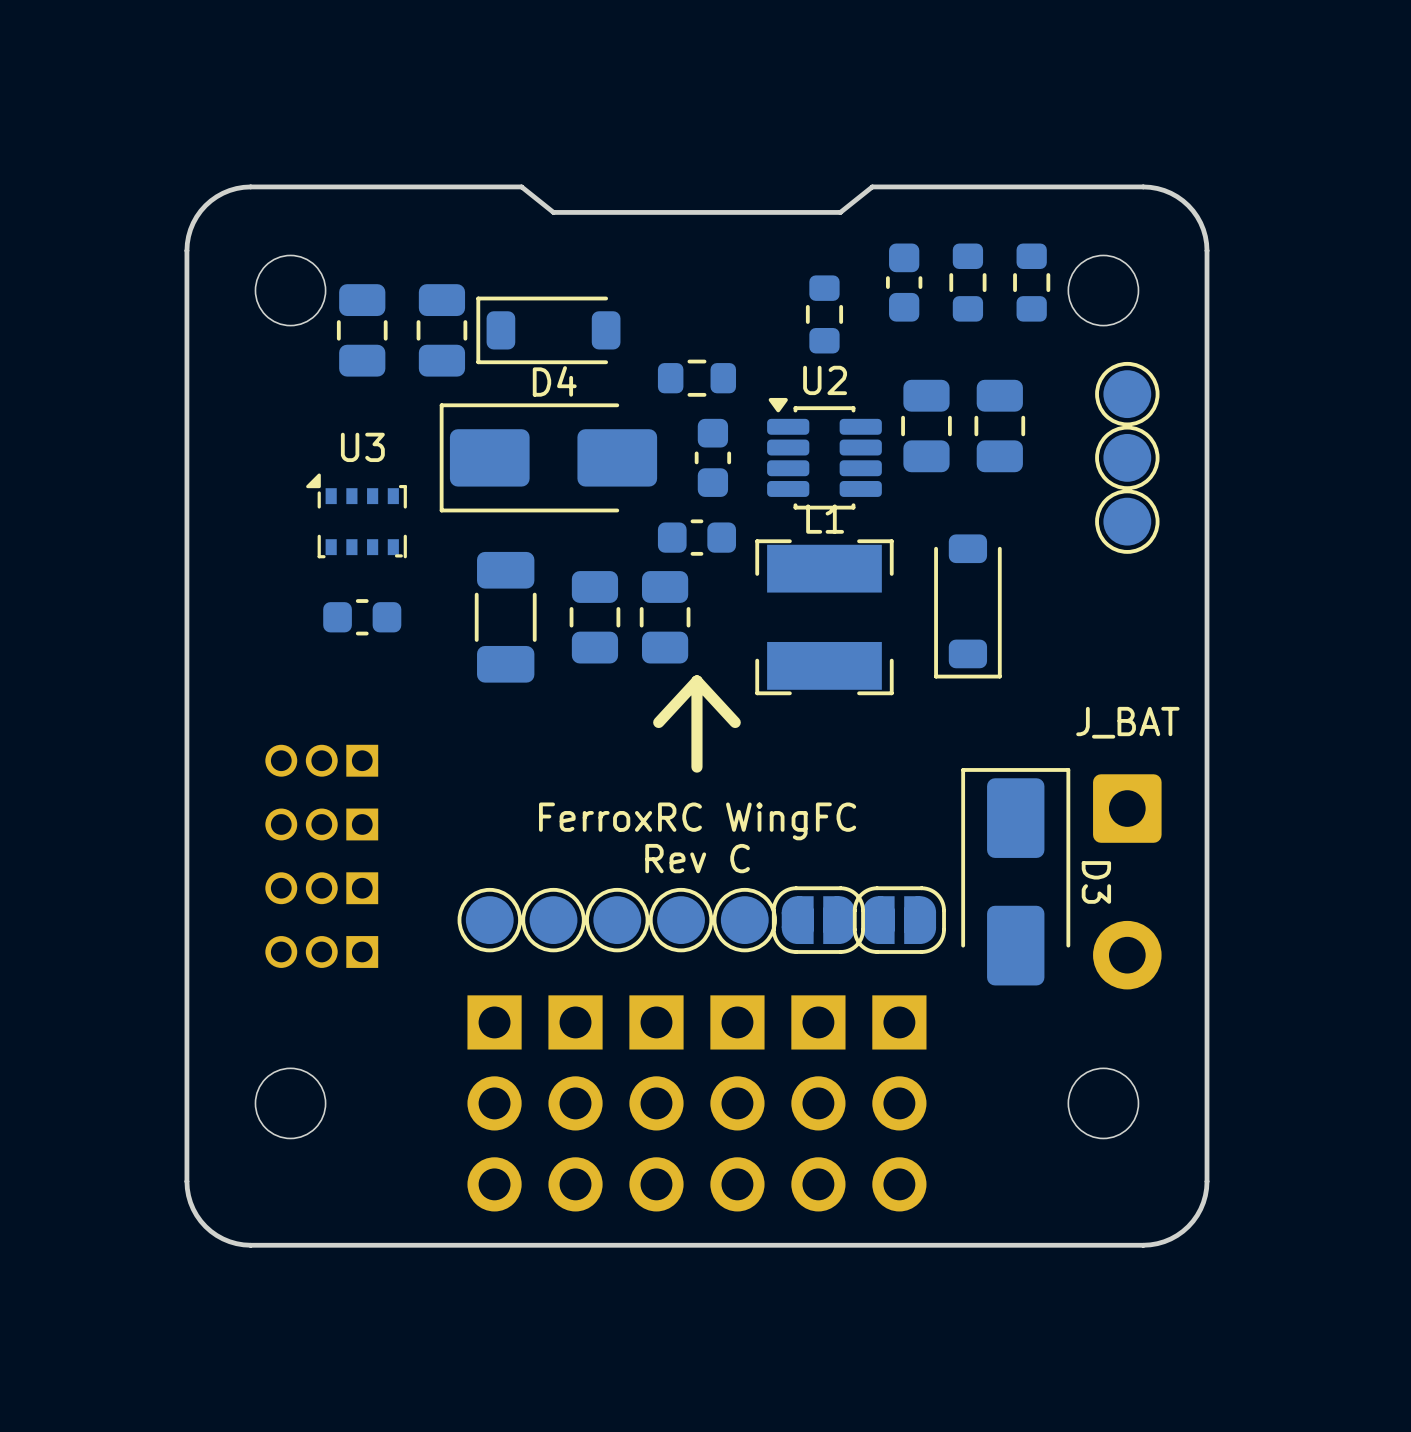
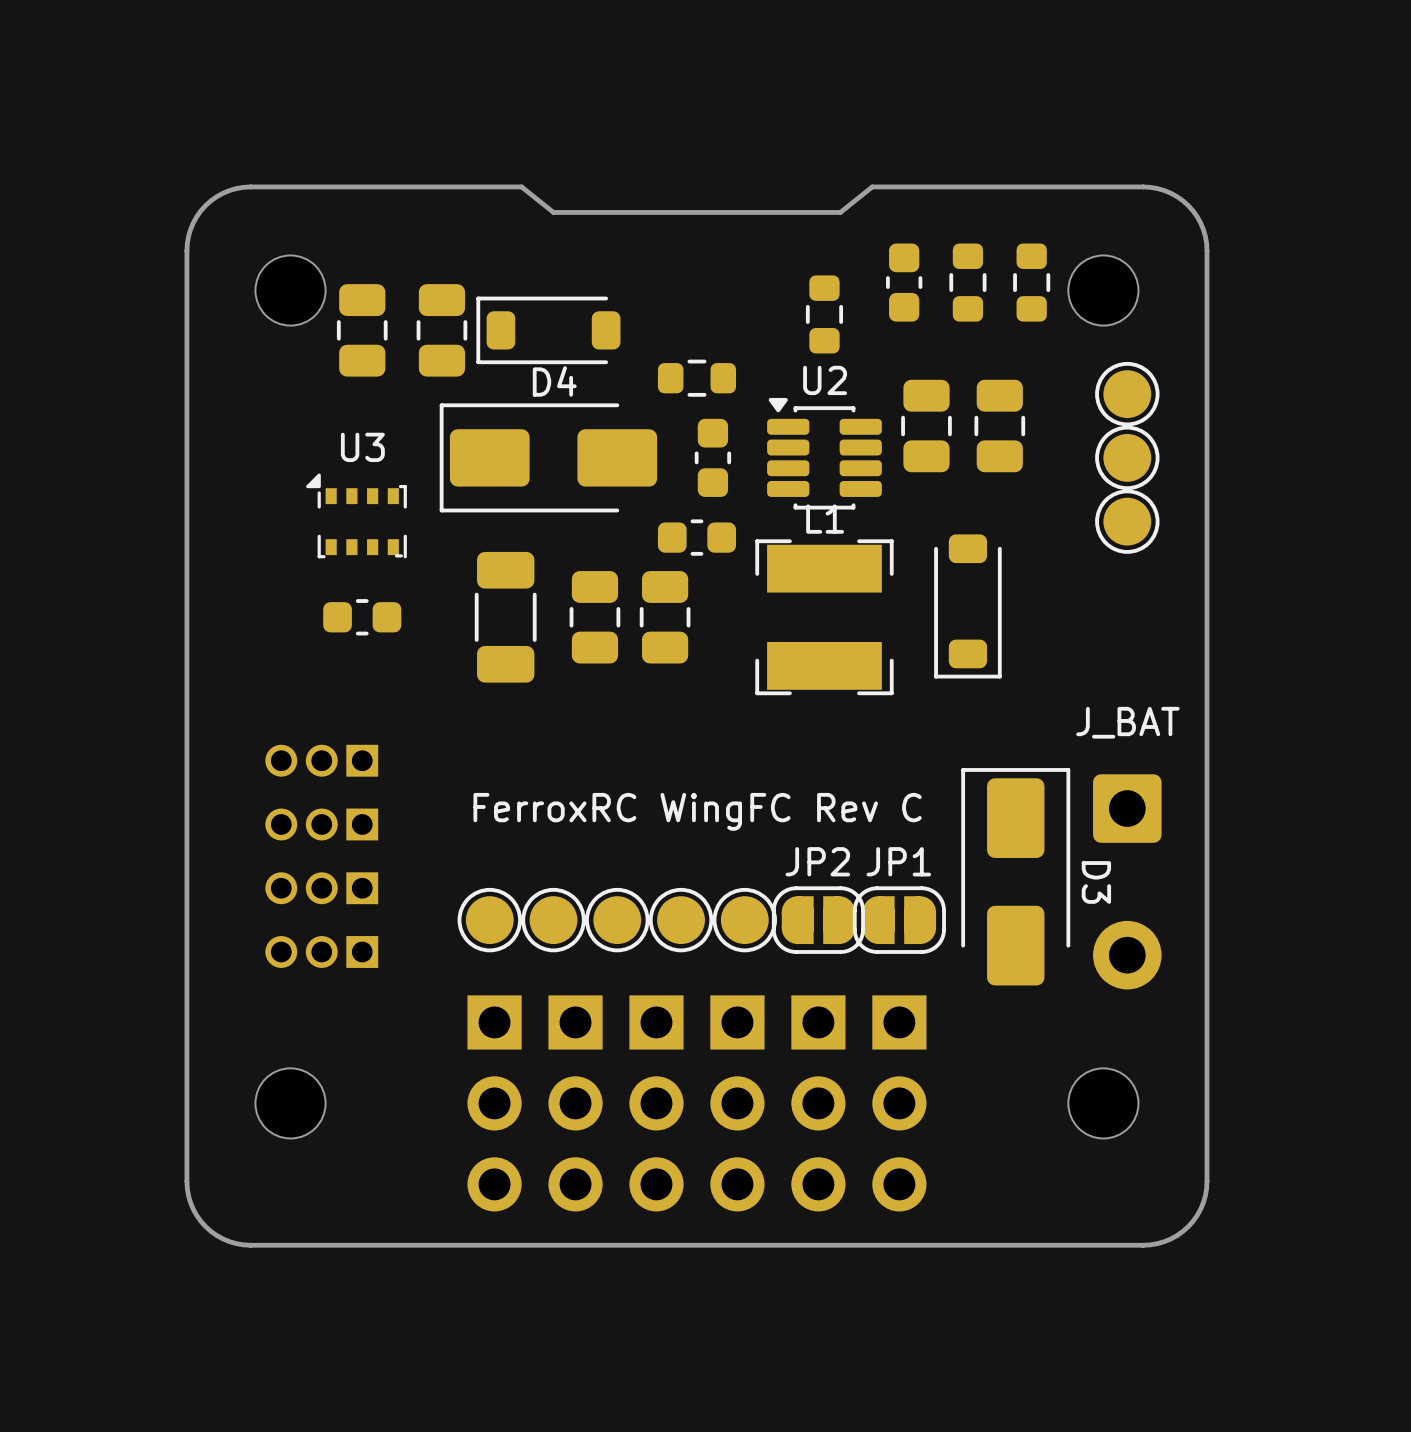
line: (696, 681) (735, 722) -> none
line: (696, 681) (658, 722) -> none
line: (696, 681) (696, 767) -> none
text: FerroxRC WingFC (697, 821) -> FerroxRC WingFC Rev C (697, 811)
text: Rev C (697, 858) -> none
JP2 name: none -> JP2 (817, 861)
JP1 name: none -> JP1 (898, 861)

